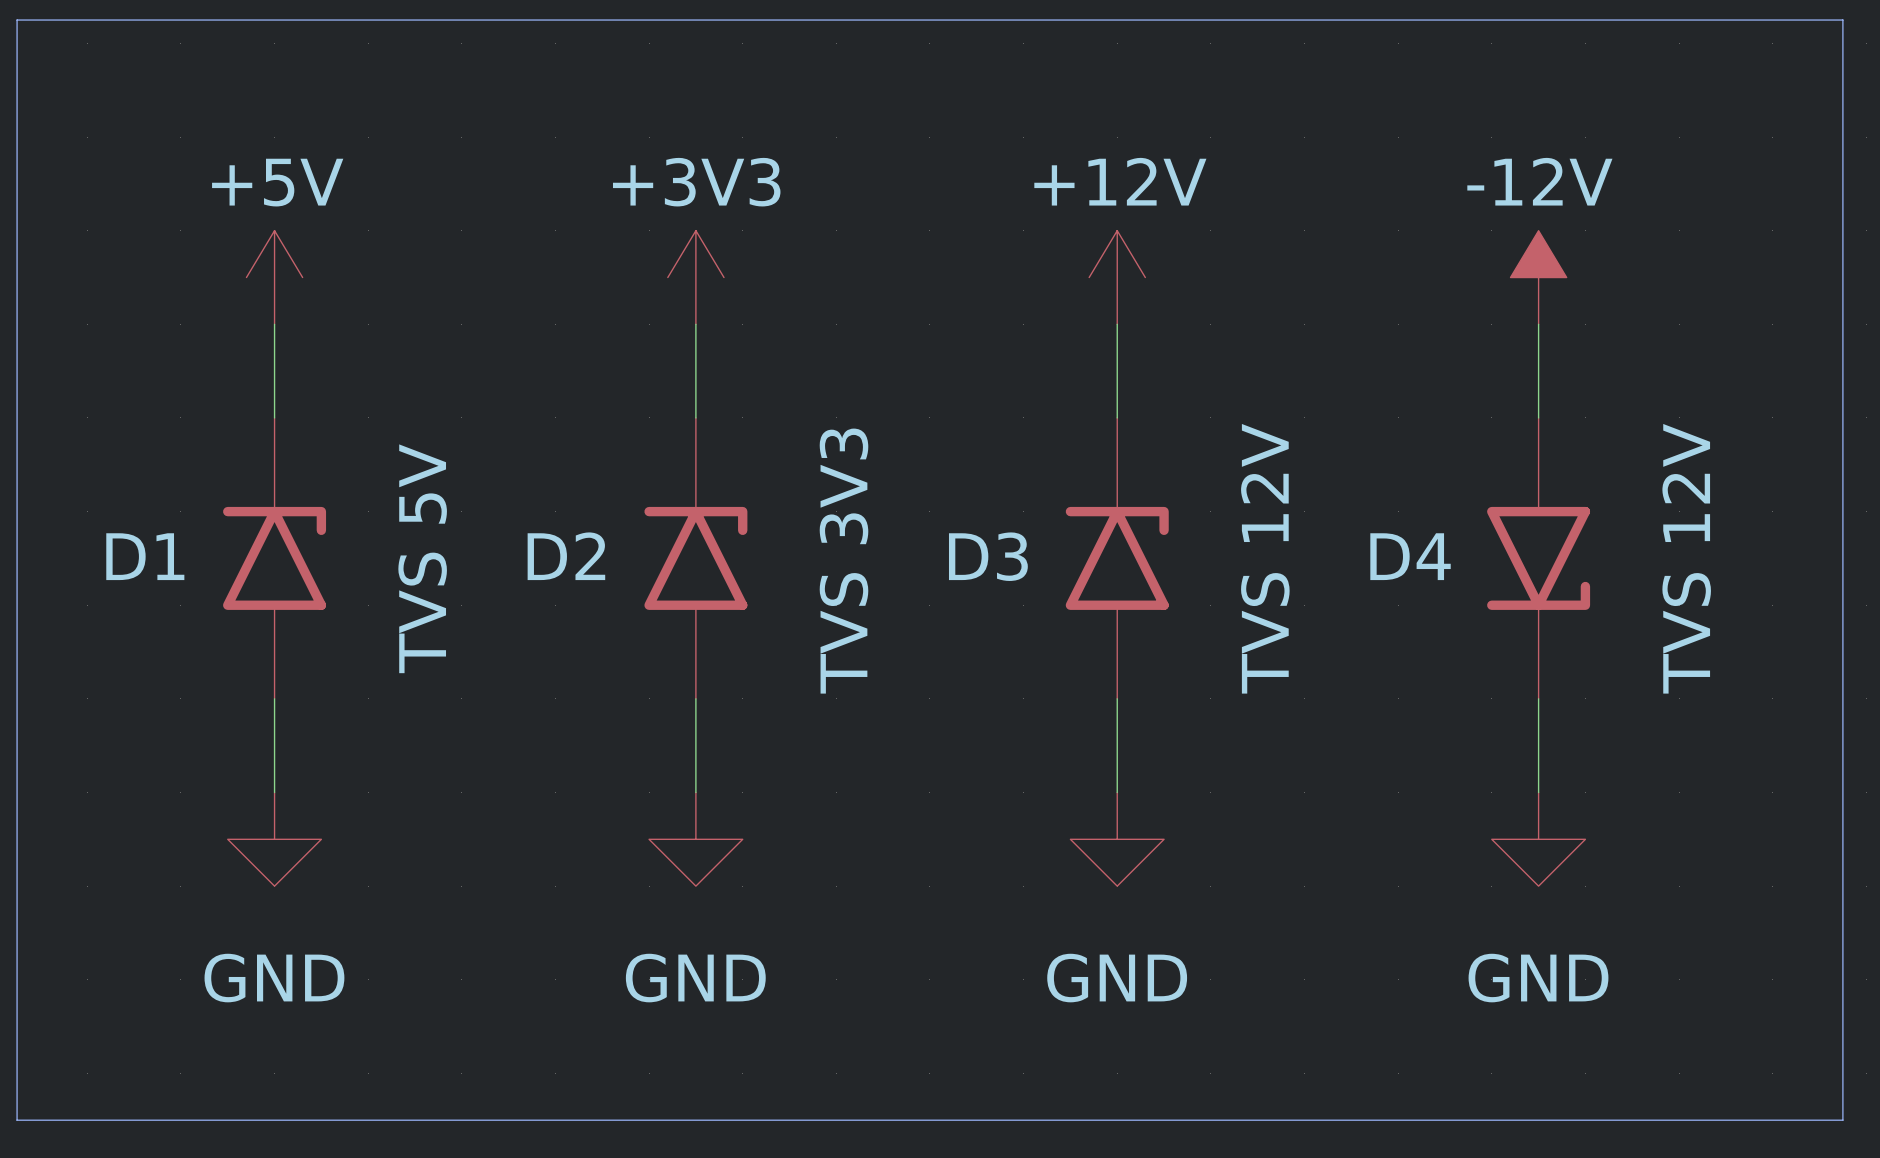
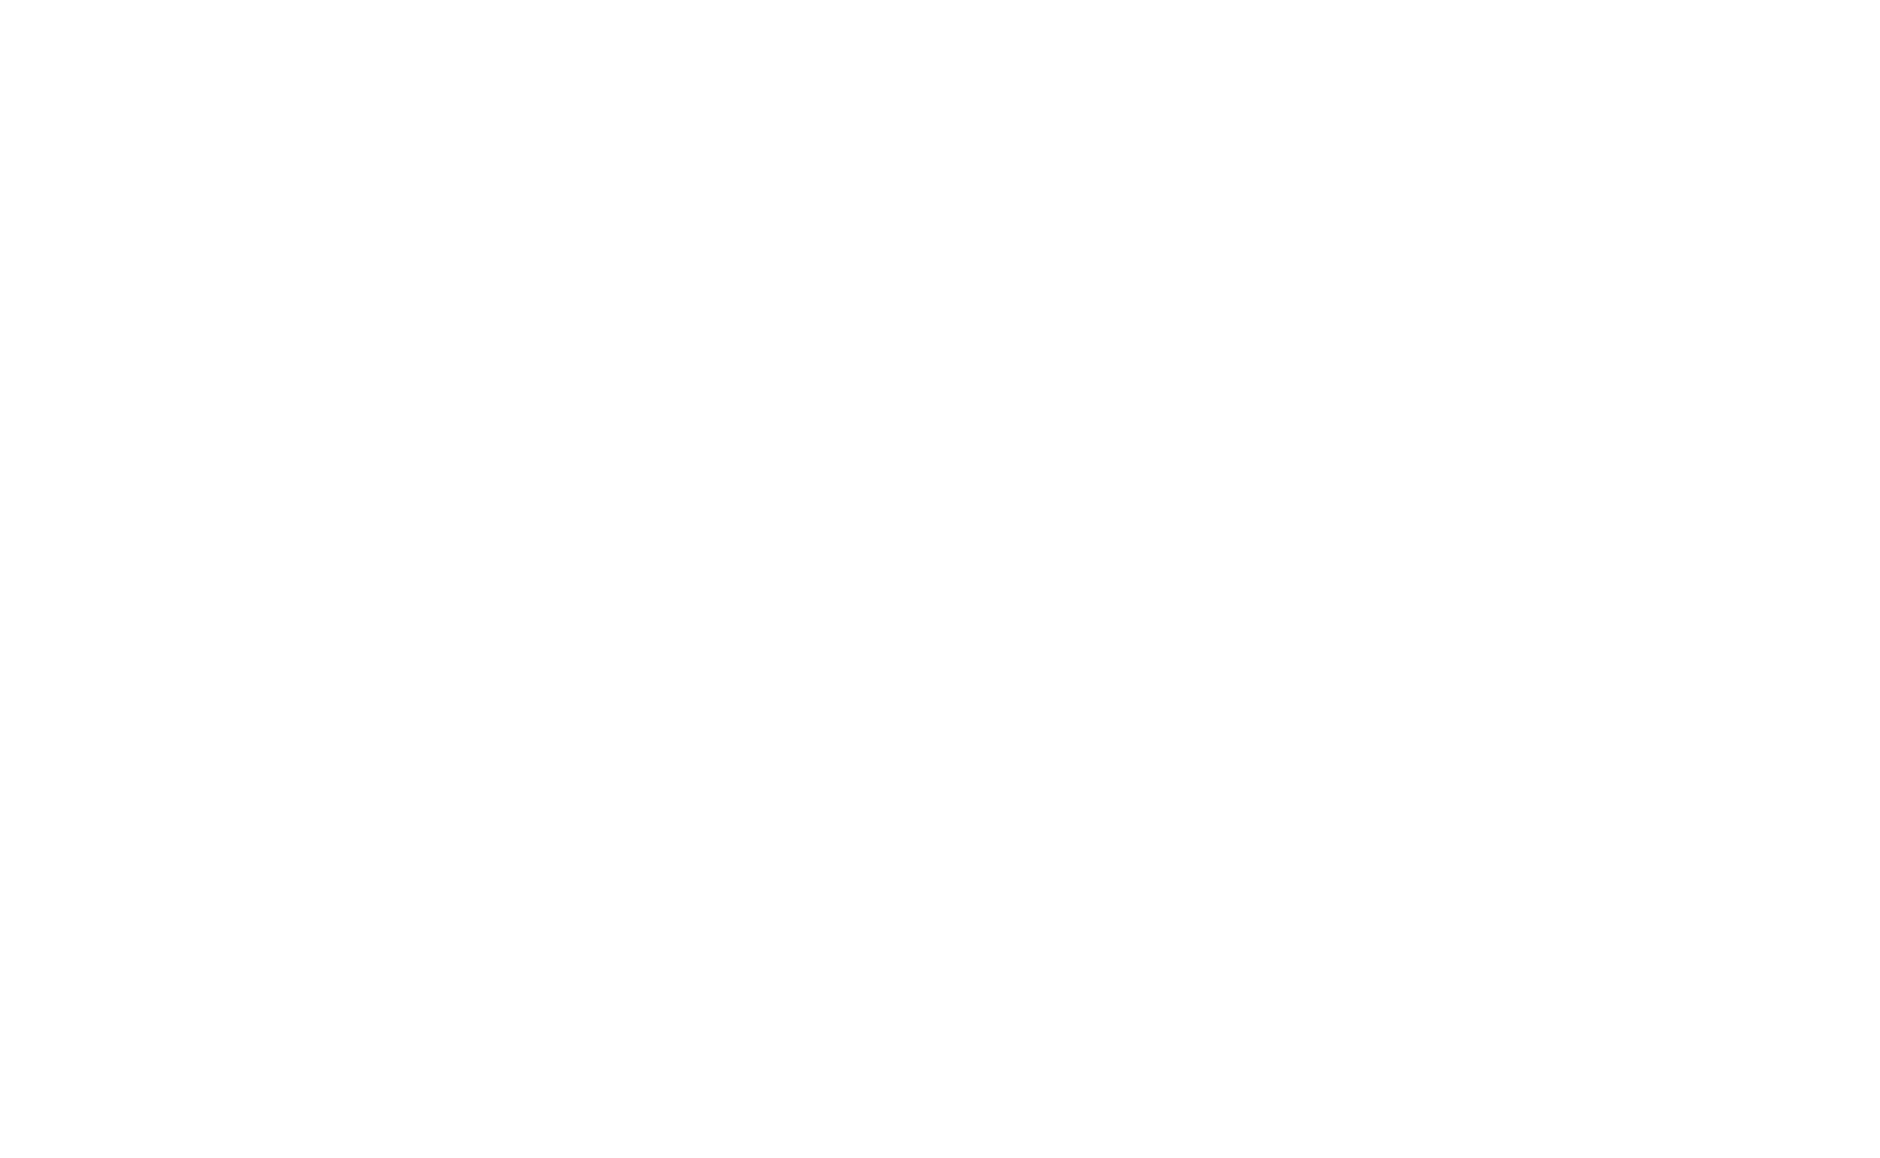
line: (17, 20) (1842, 20) (1842, 1120) (17, 1120) (17, 20) -> none
power symbol: +5V (274, 277) -> none
power symbol: +3V3 (695, 277) -> none
power symbol: +12V (1117, 277) -> none
power symbol: -12V (1538, 277) -> none
wire: (274, 324) (274, 417) -> none
wire: (695, 324) (695, 417) -> none
wire: (1117, 324) (1117, 417) -> none
wire: (1538, 324) (1538, 417) -> none
D1: TVS 5V (274, 558) -> none
D2: TVS 3V3 (695, 558) -> none
D3: TVS 12V (1117, 558) -> none
D4: TVS 12V (1538, 558) -> none
wire: (274, 698) (274, 792) -> none
wire: (695, 698) (695, 792) -> none
wire: (1117, 698) (1117, 792) -> none
wire: (1538, 698) (1538, 792) -> none
power symbol: GND (274, 839) -> none
power symbol: GND (695, 839) -> none
power symbol: GND (1117, 839) -> none
power symbol: GND (1538, 839) -> none

